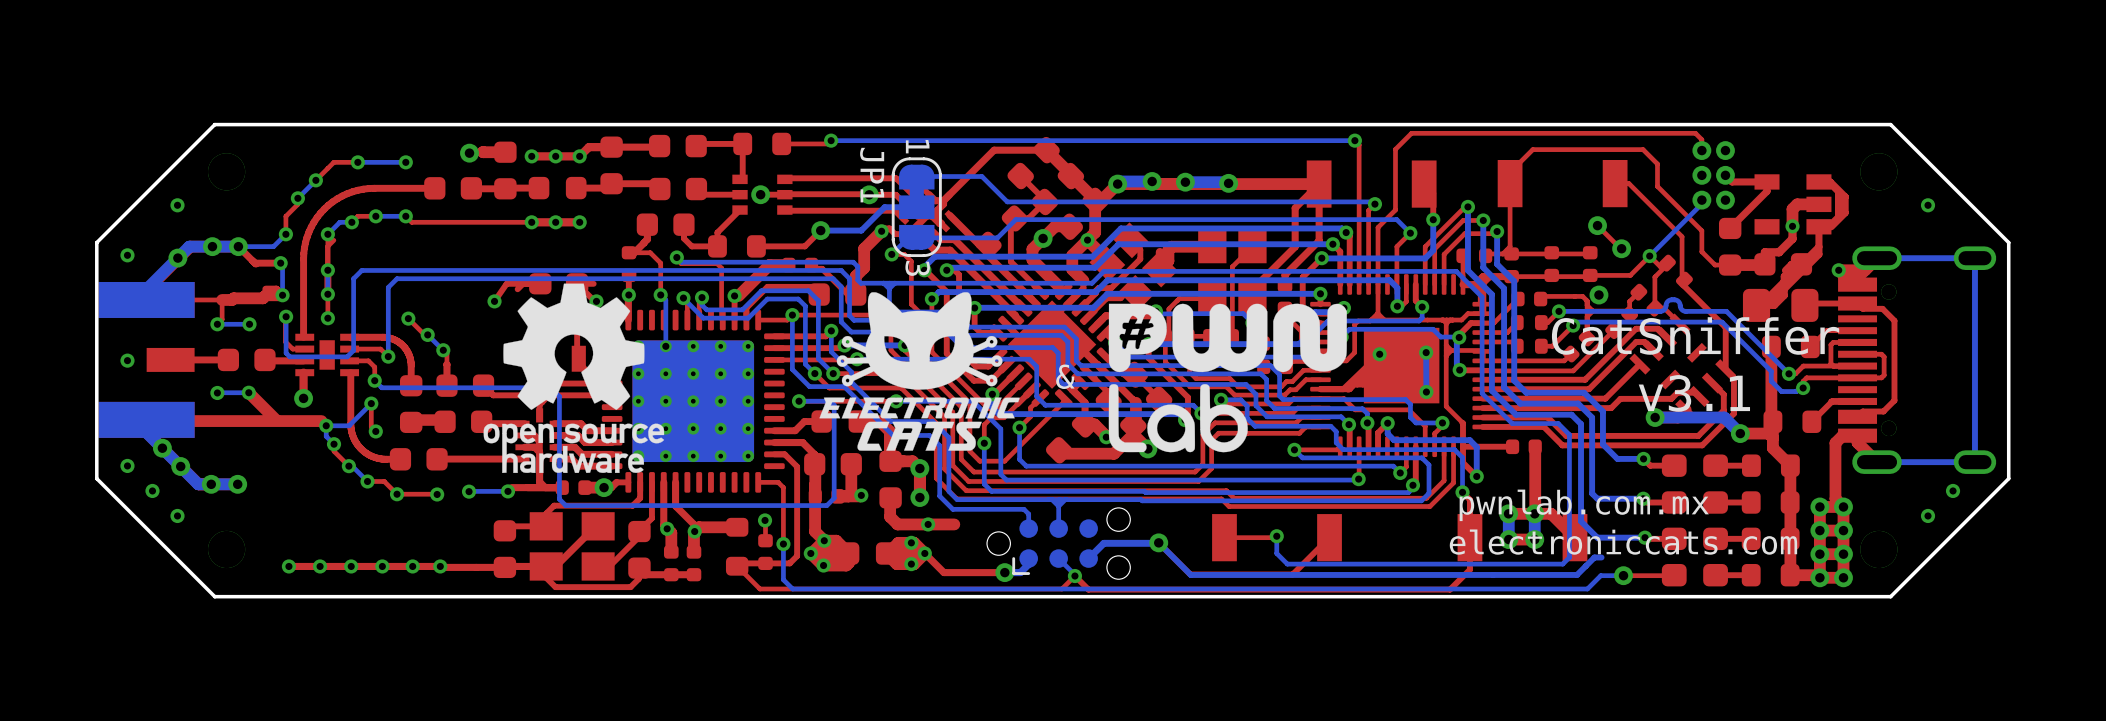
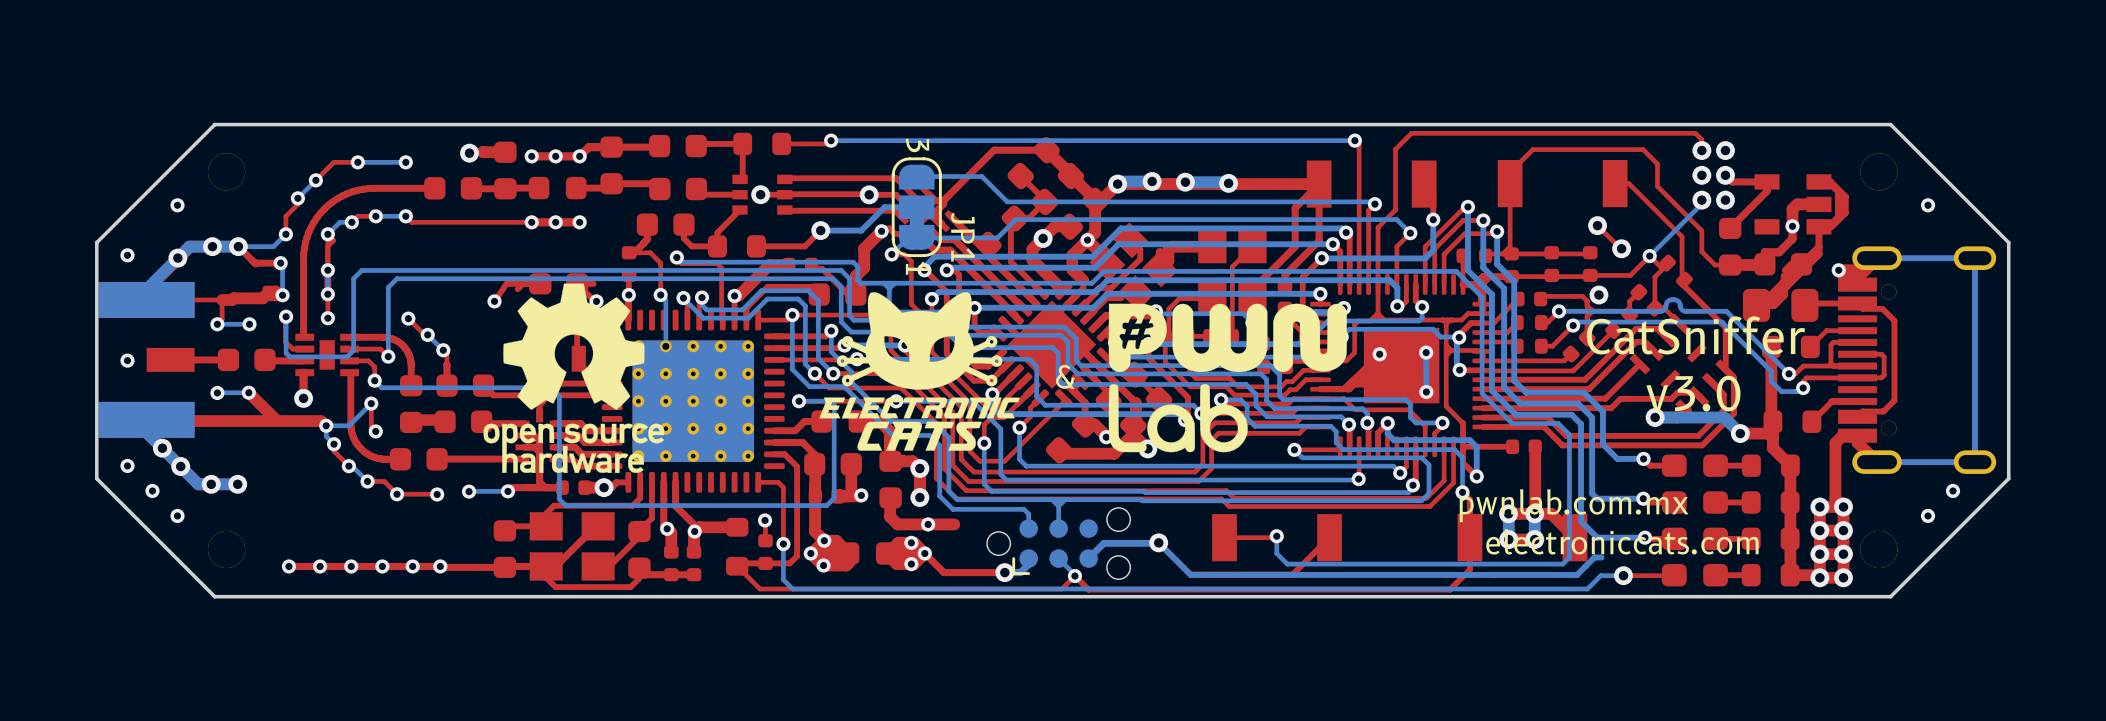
JP1 rotation: 0° (916, 207) -> 180° (916, 207)
text: v3.1 (1694, 393) -> v3.0 (1693, 393)

